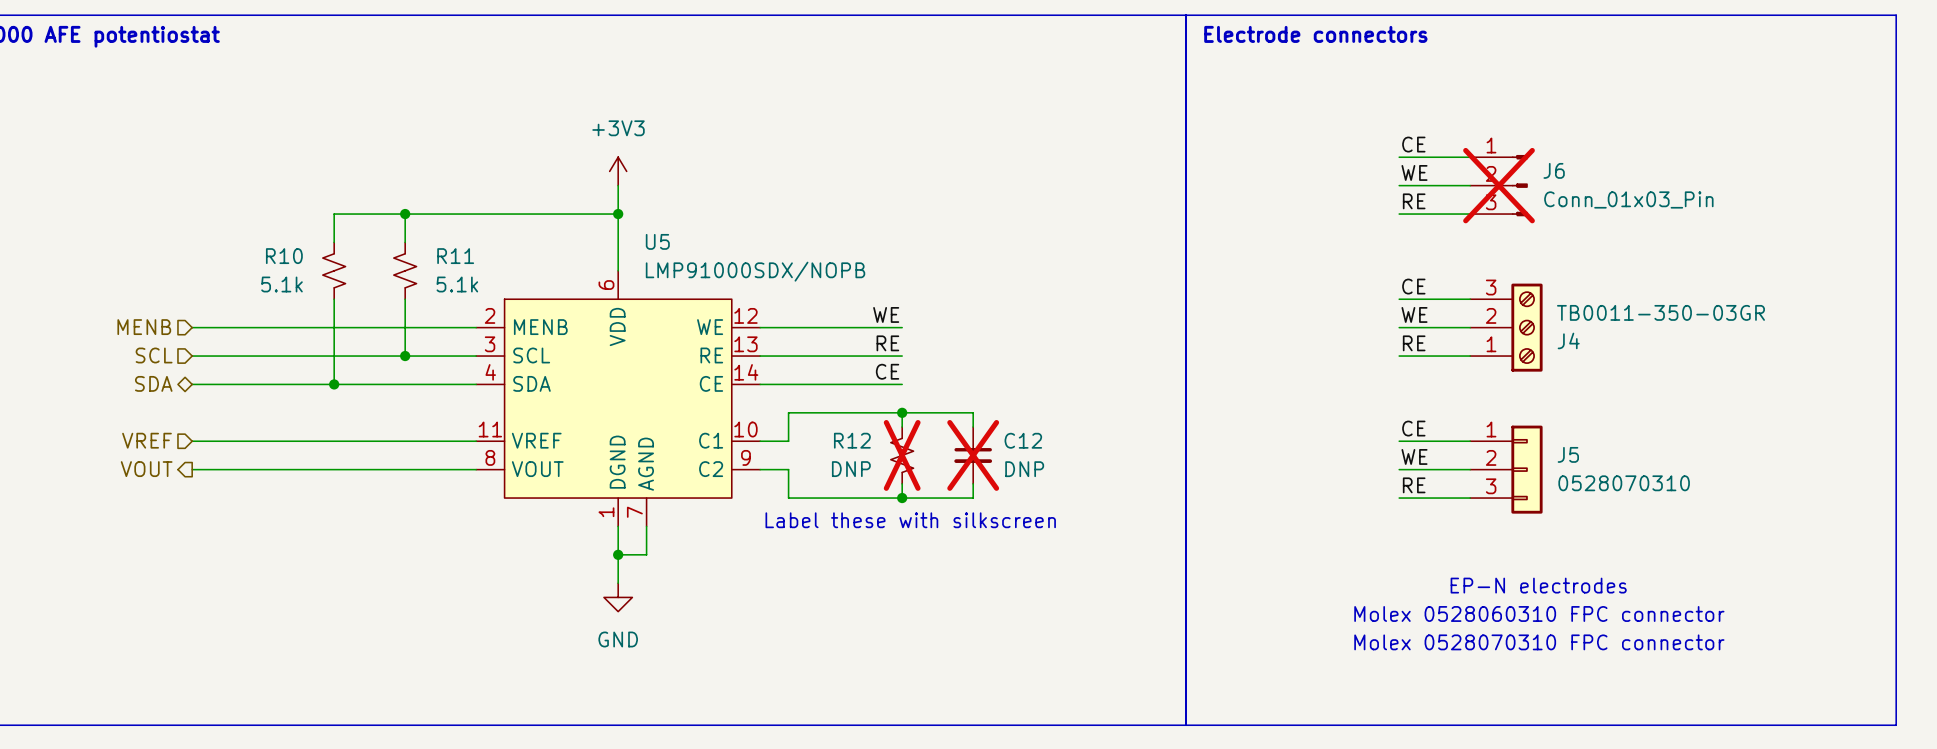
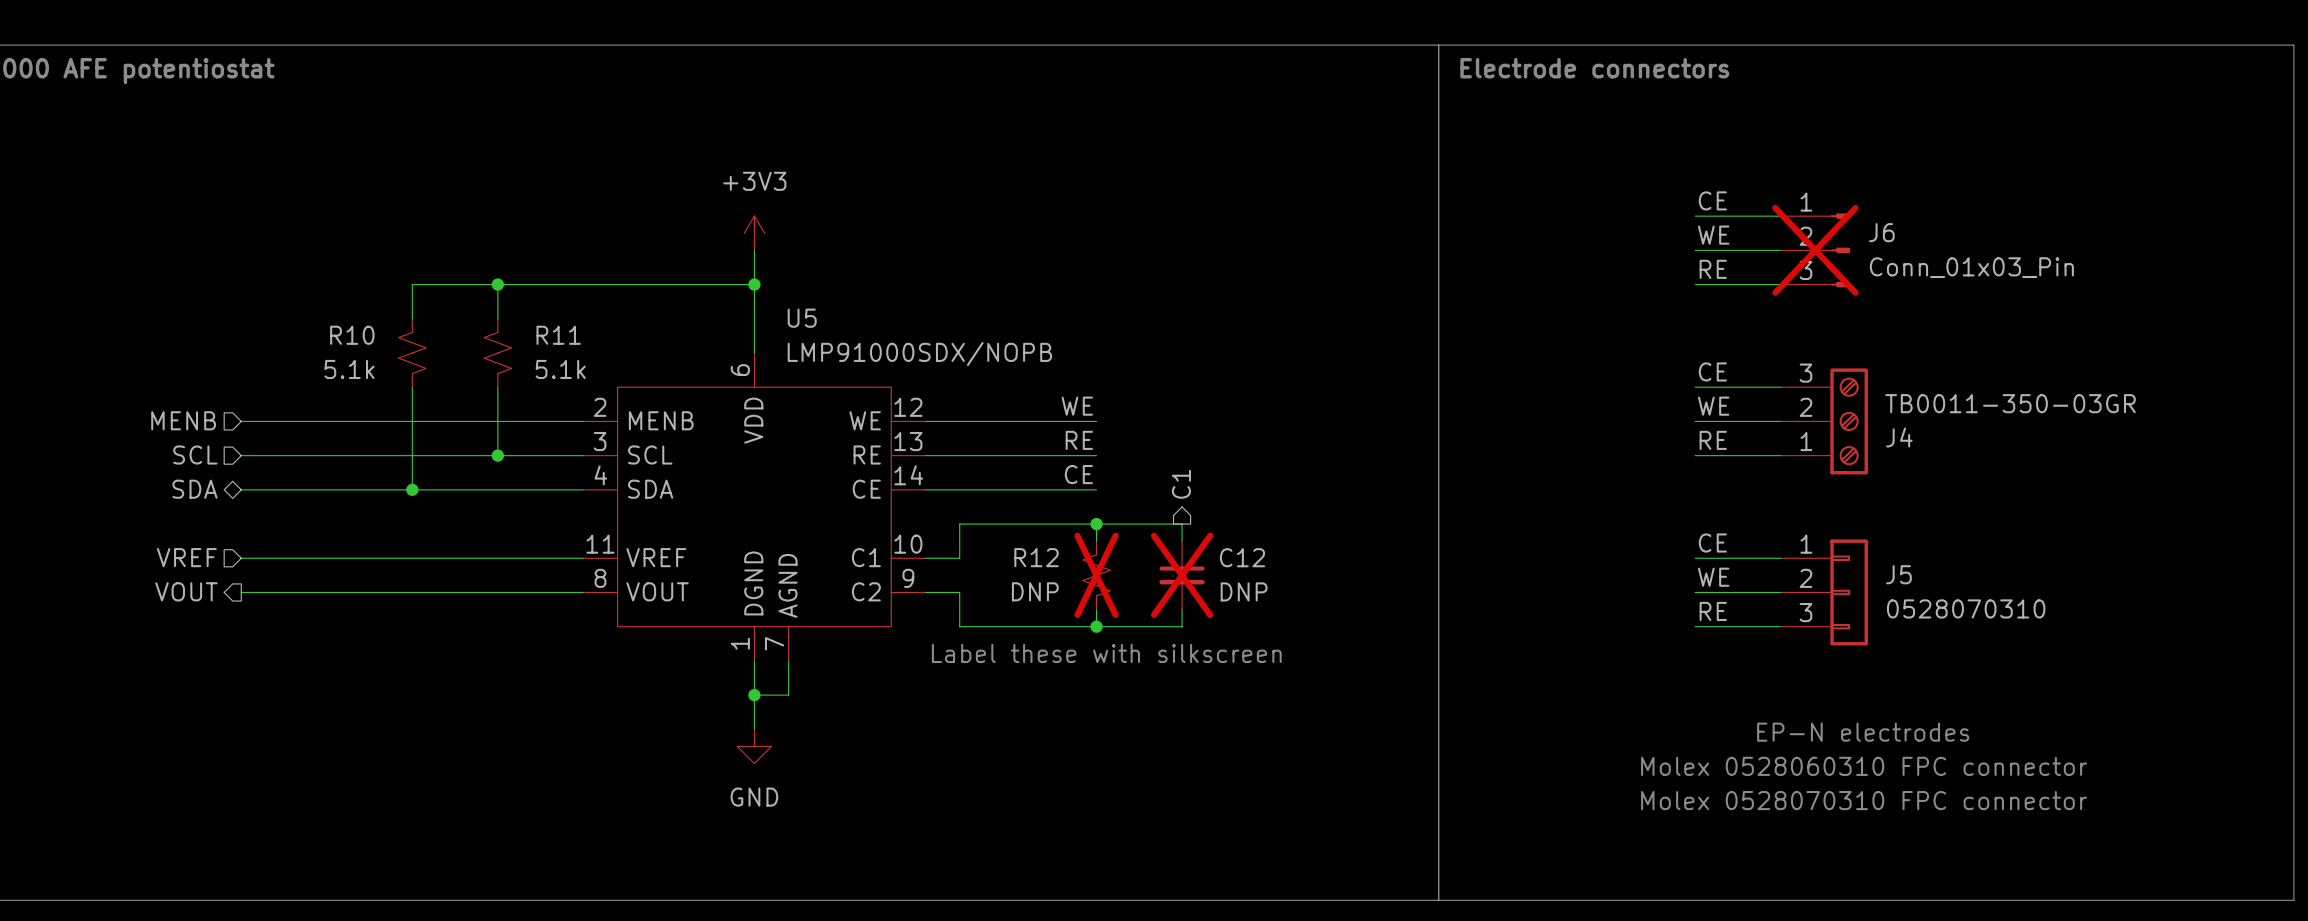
hierarchical label: none -> C1 (1181, 484)

